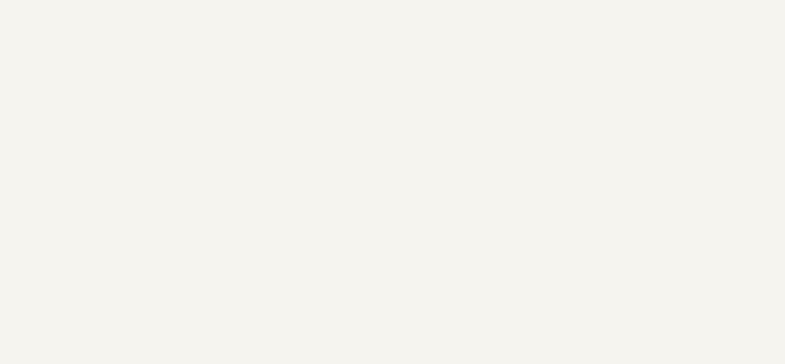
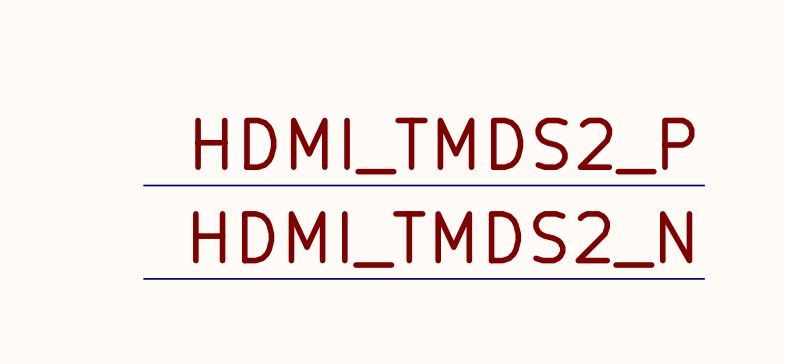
label: none -> HDMI_TMDS2_P (444, 146)
wire: none -> (143, 185) (704, 185)
label: none -> HDMI_TMDS2_N (442, 239)
wire: none -> (143, 278) (704, 278)

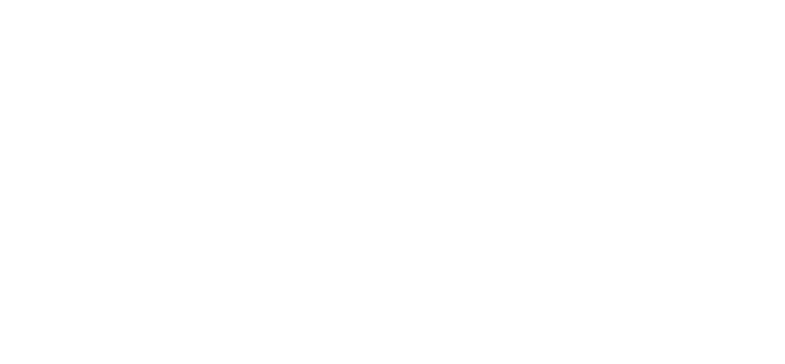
label: HDMI_TMDS2_P (444, 146) -> none
wire: (143, 185) (704, 185) -> none
label: HDMI_TMDS2_N (442, 239) -> none
wire: (143, 278) (704, 278) -> none

